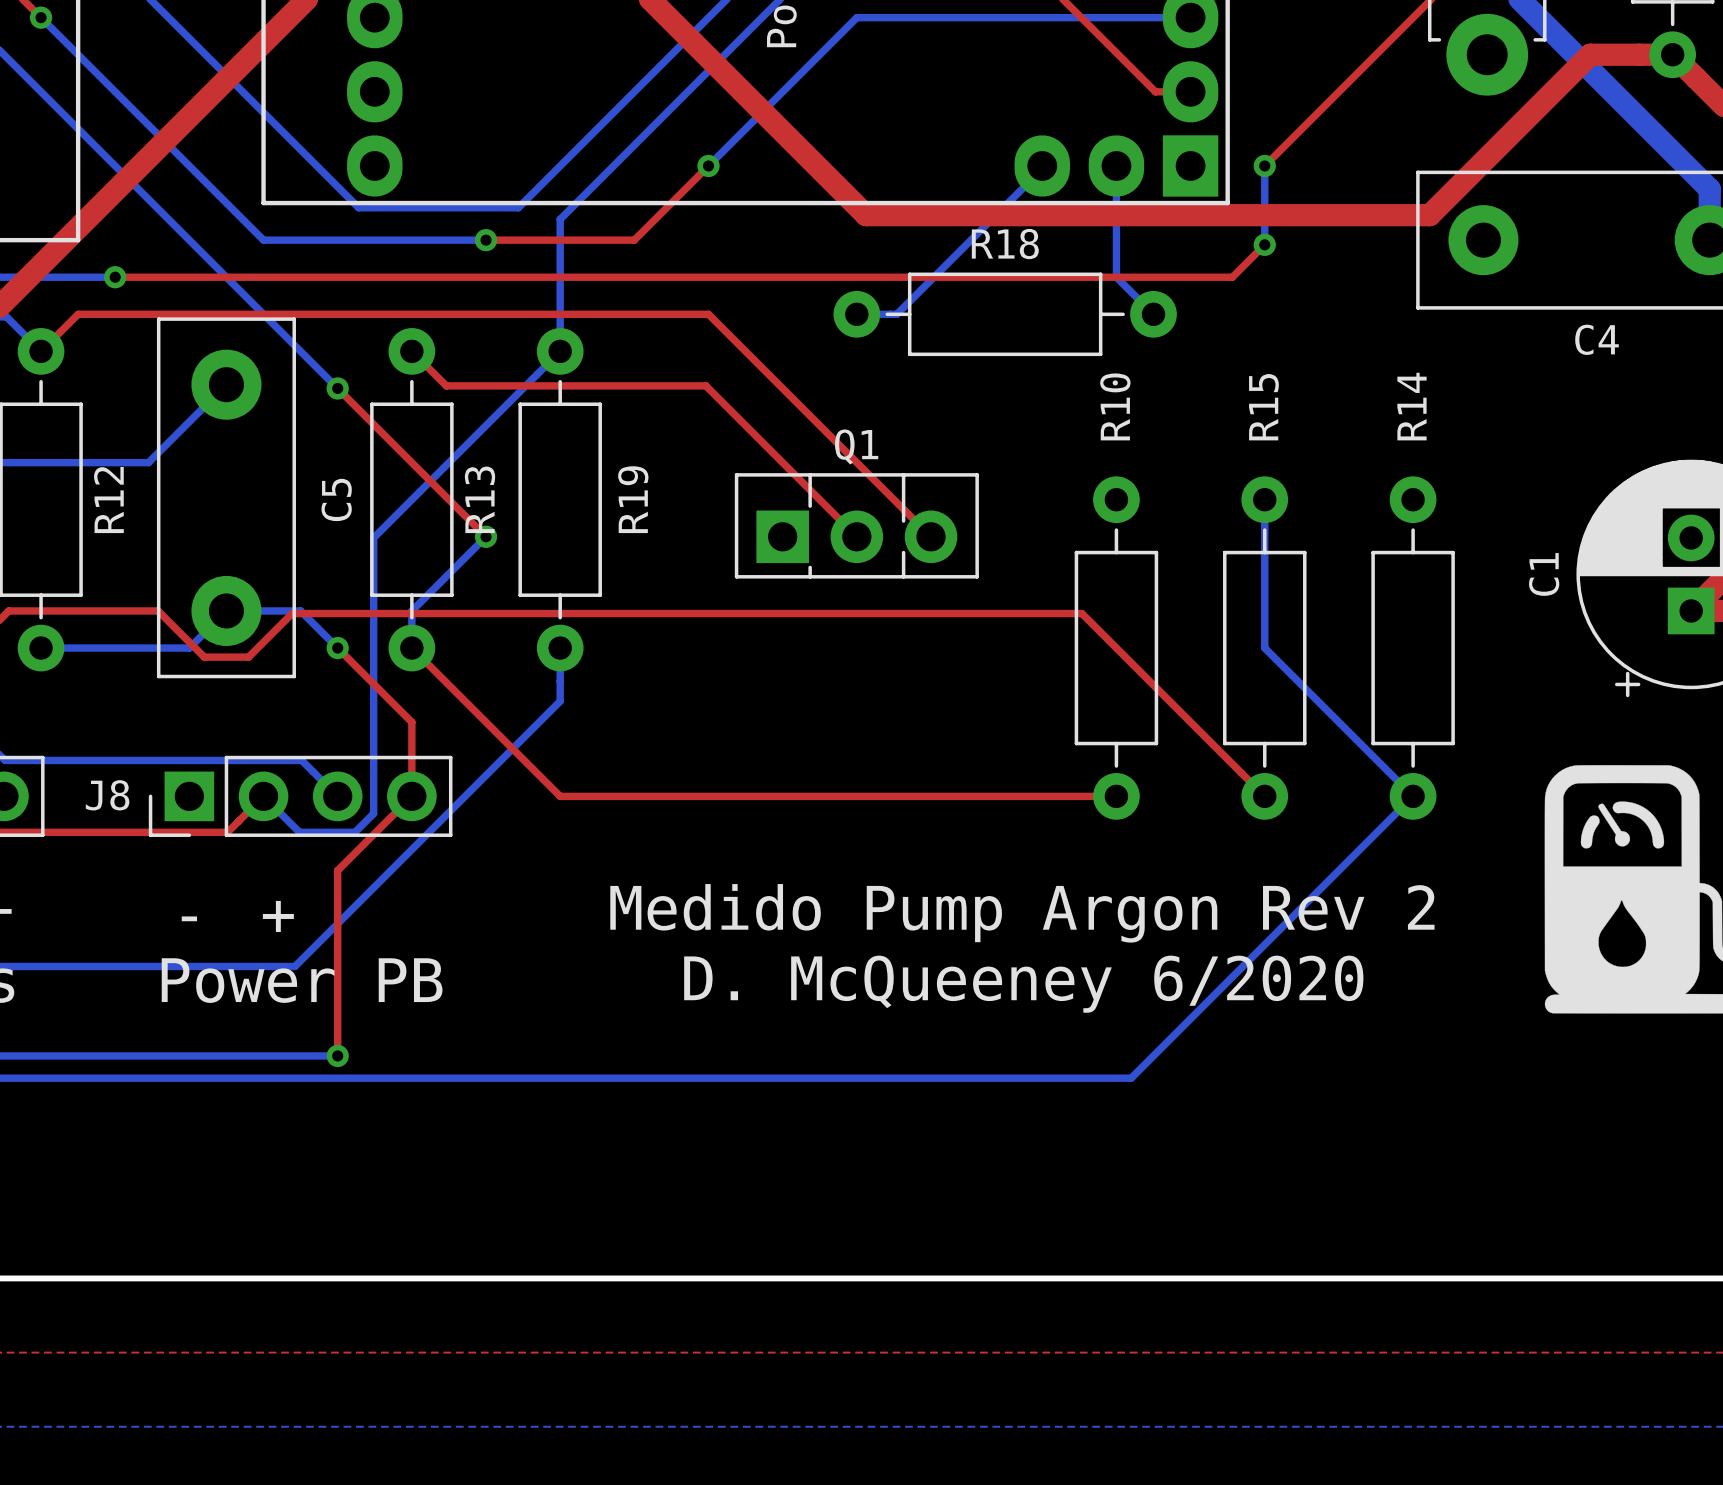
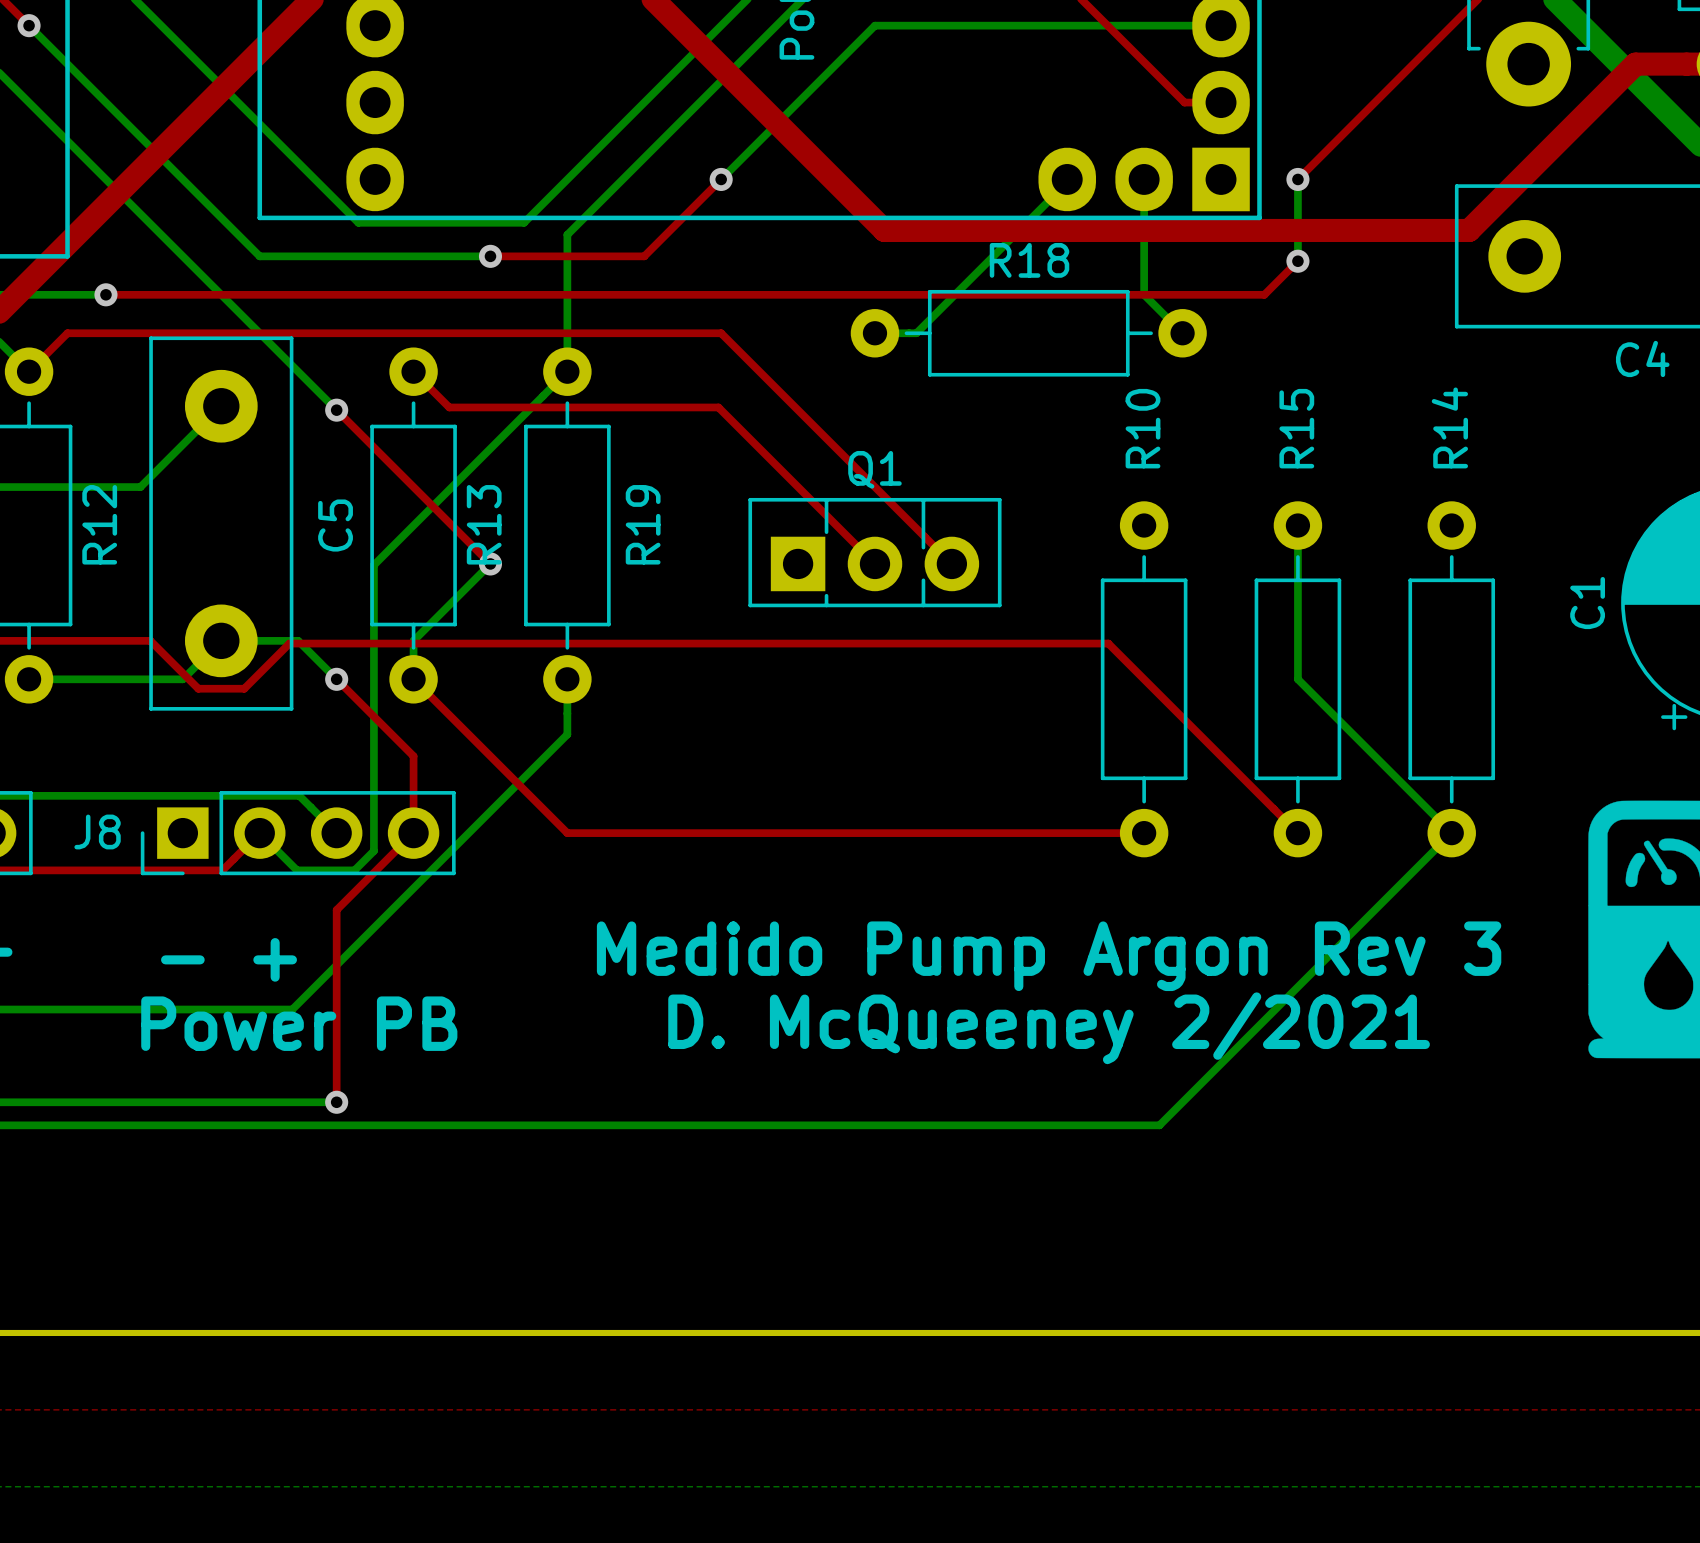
text: Medido Pump Argon Rev 2 (1022, 913) -> Medido Pump Argon Rev 3 (1049, 956)
text: D. McQueeney 6/2020 (1023, 984) -> D. McQueeney 2/2021 (1049, 1028)

